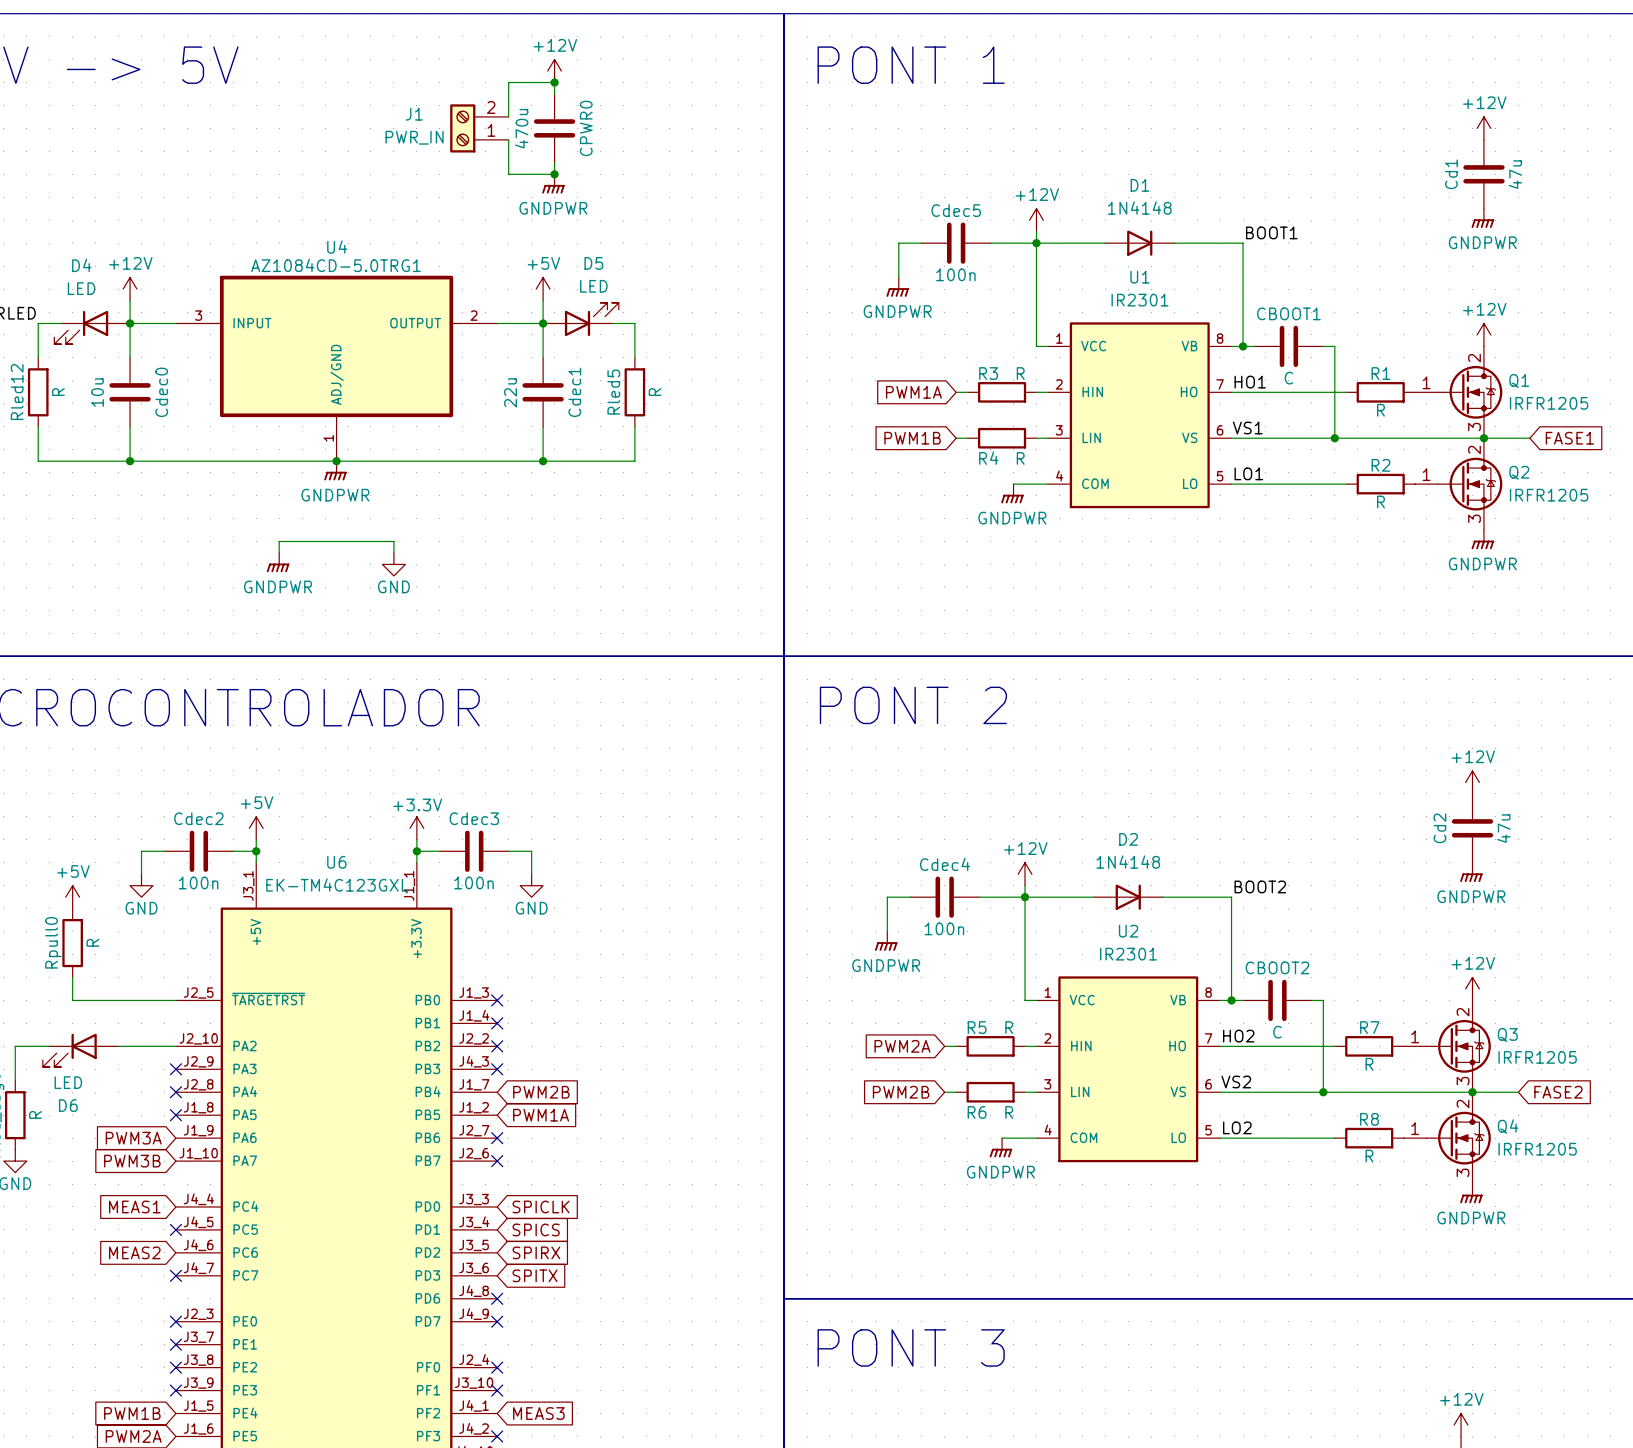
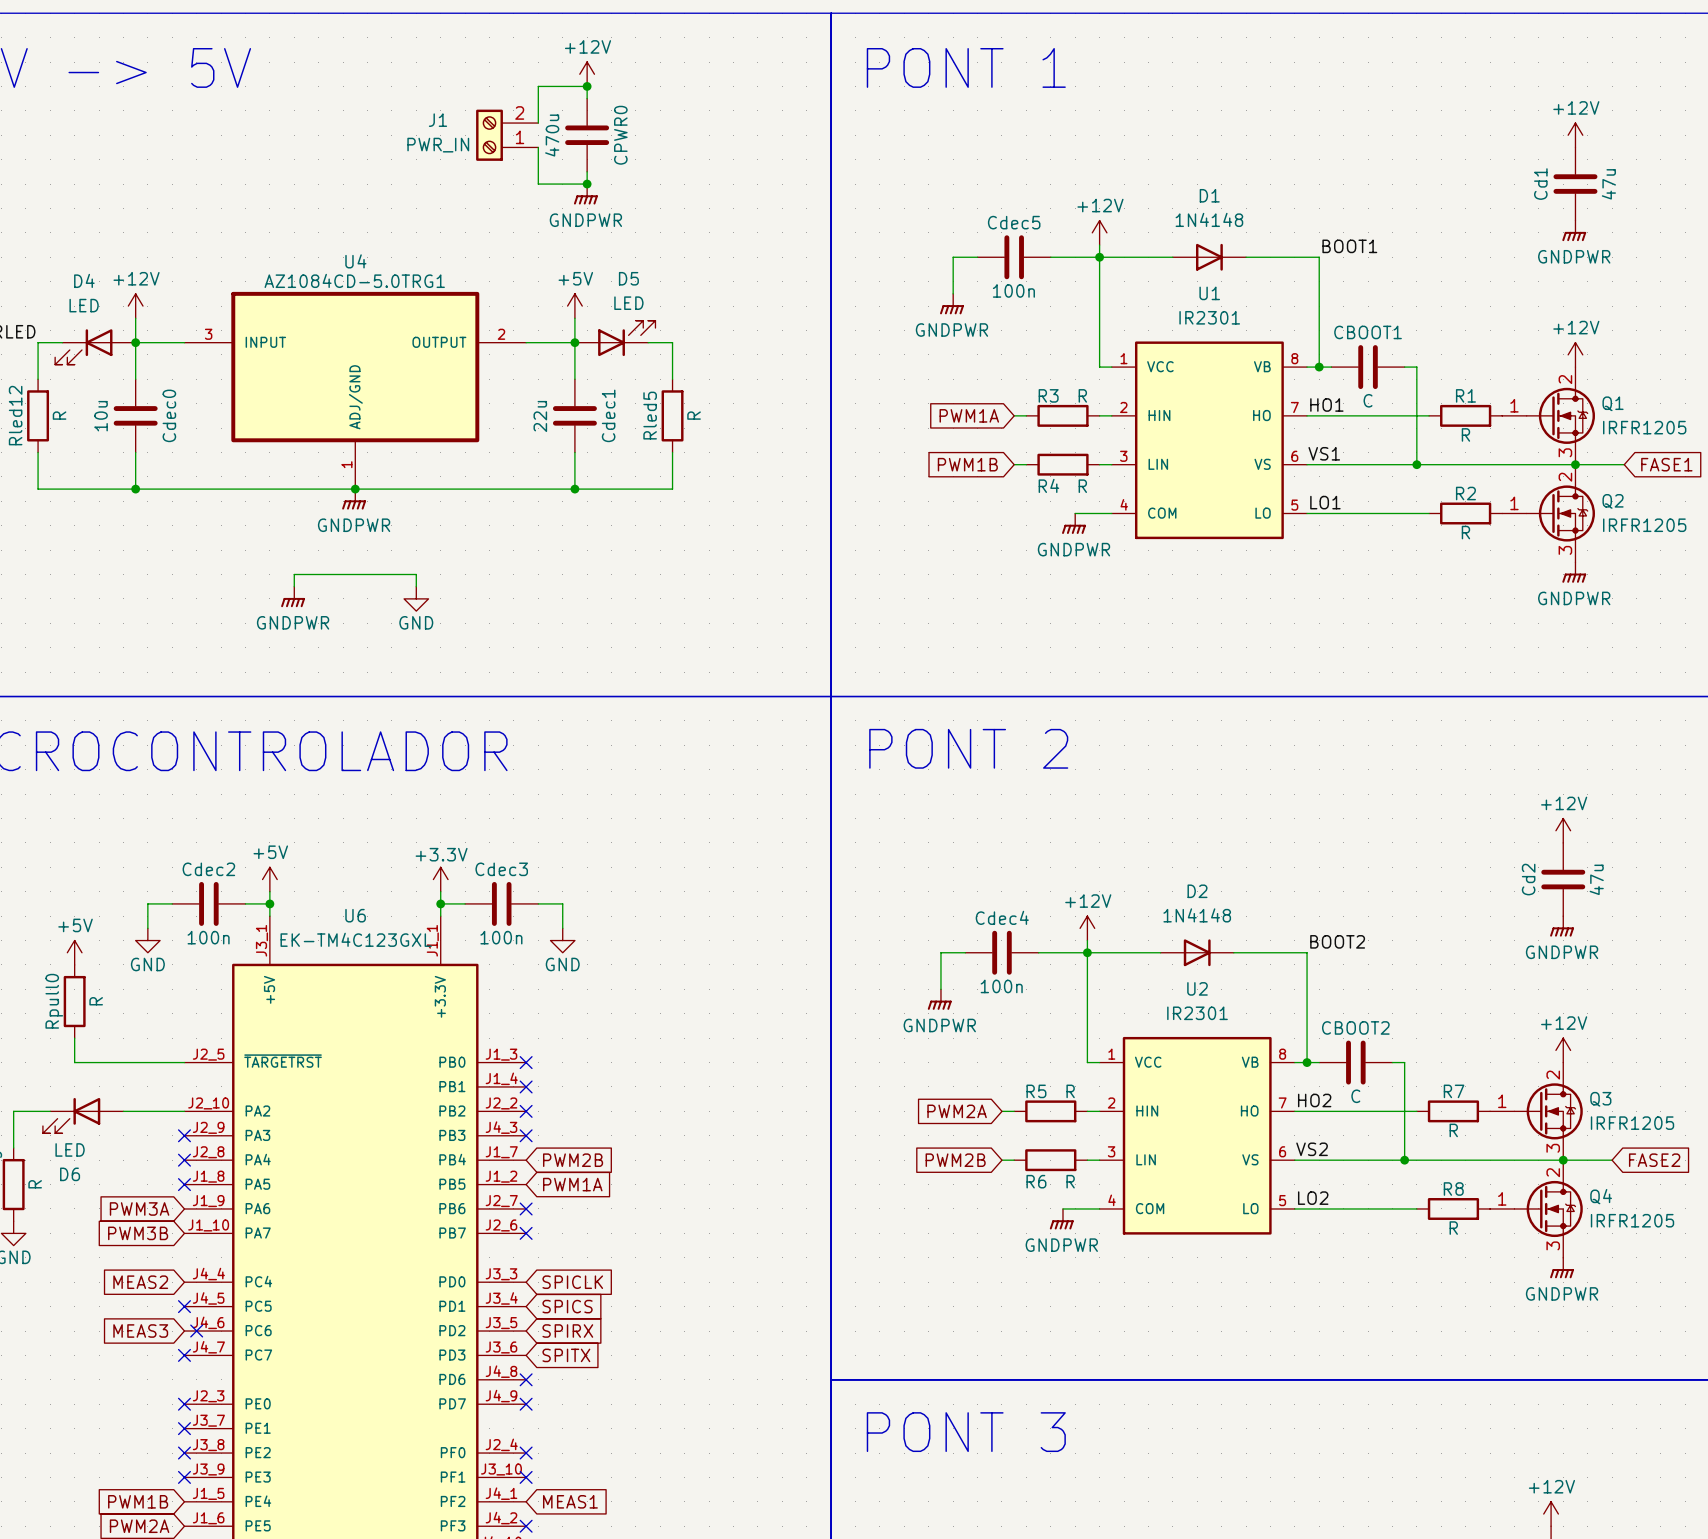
global label: MEAS1 (134, 1206) -> MEAS2 (140, 1282)
global label: MEAS2 (134, 1252) -> MEAS3 (140, 1331)
no-connect mark: none -> (196, 1331)
global label: MEAS3 (538, 1413) -> MEAS1 (570, 1501)

